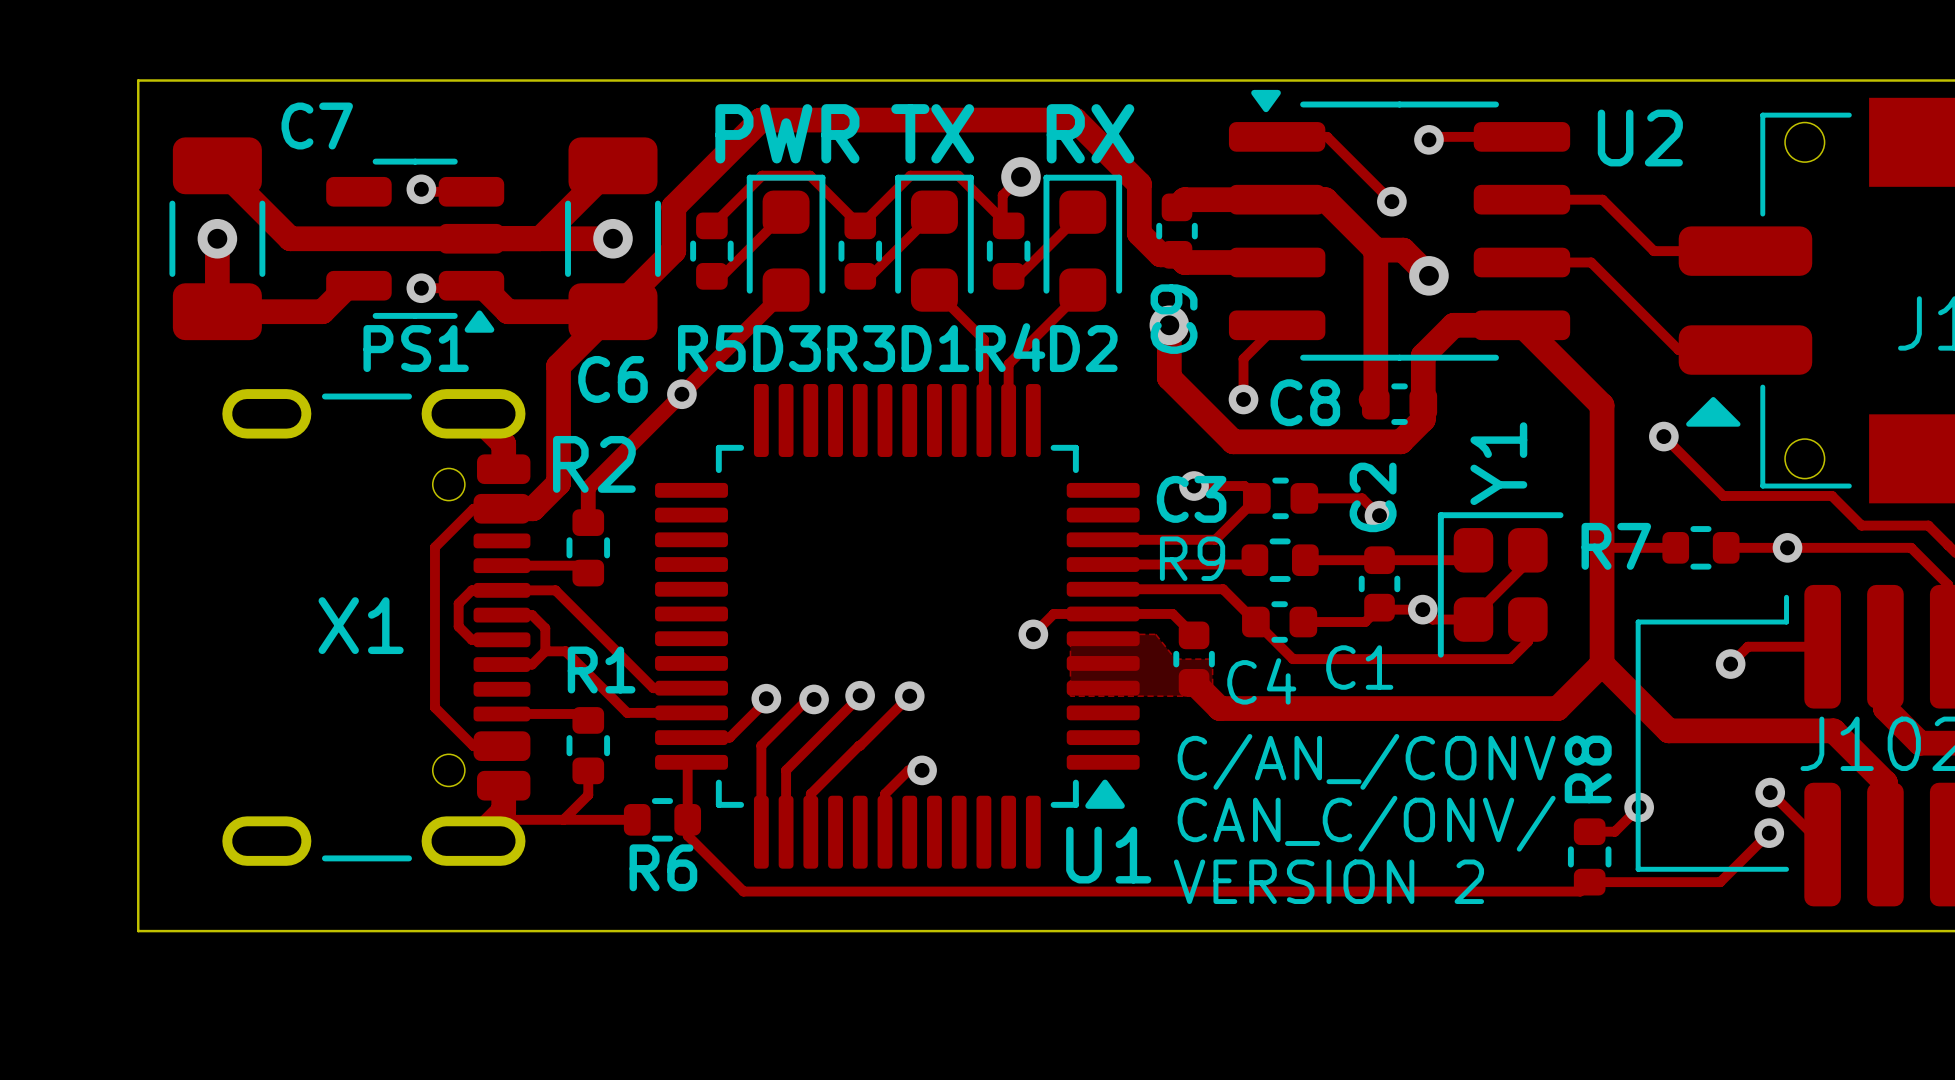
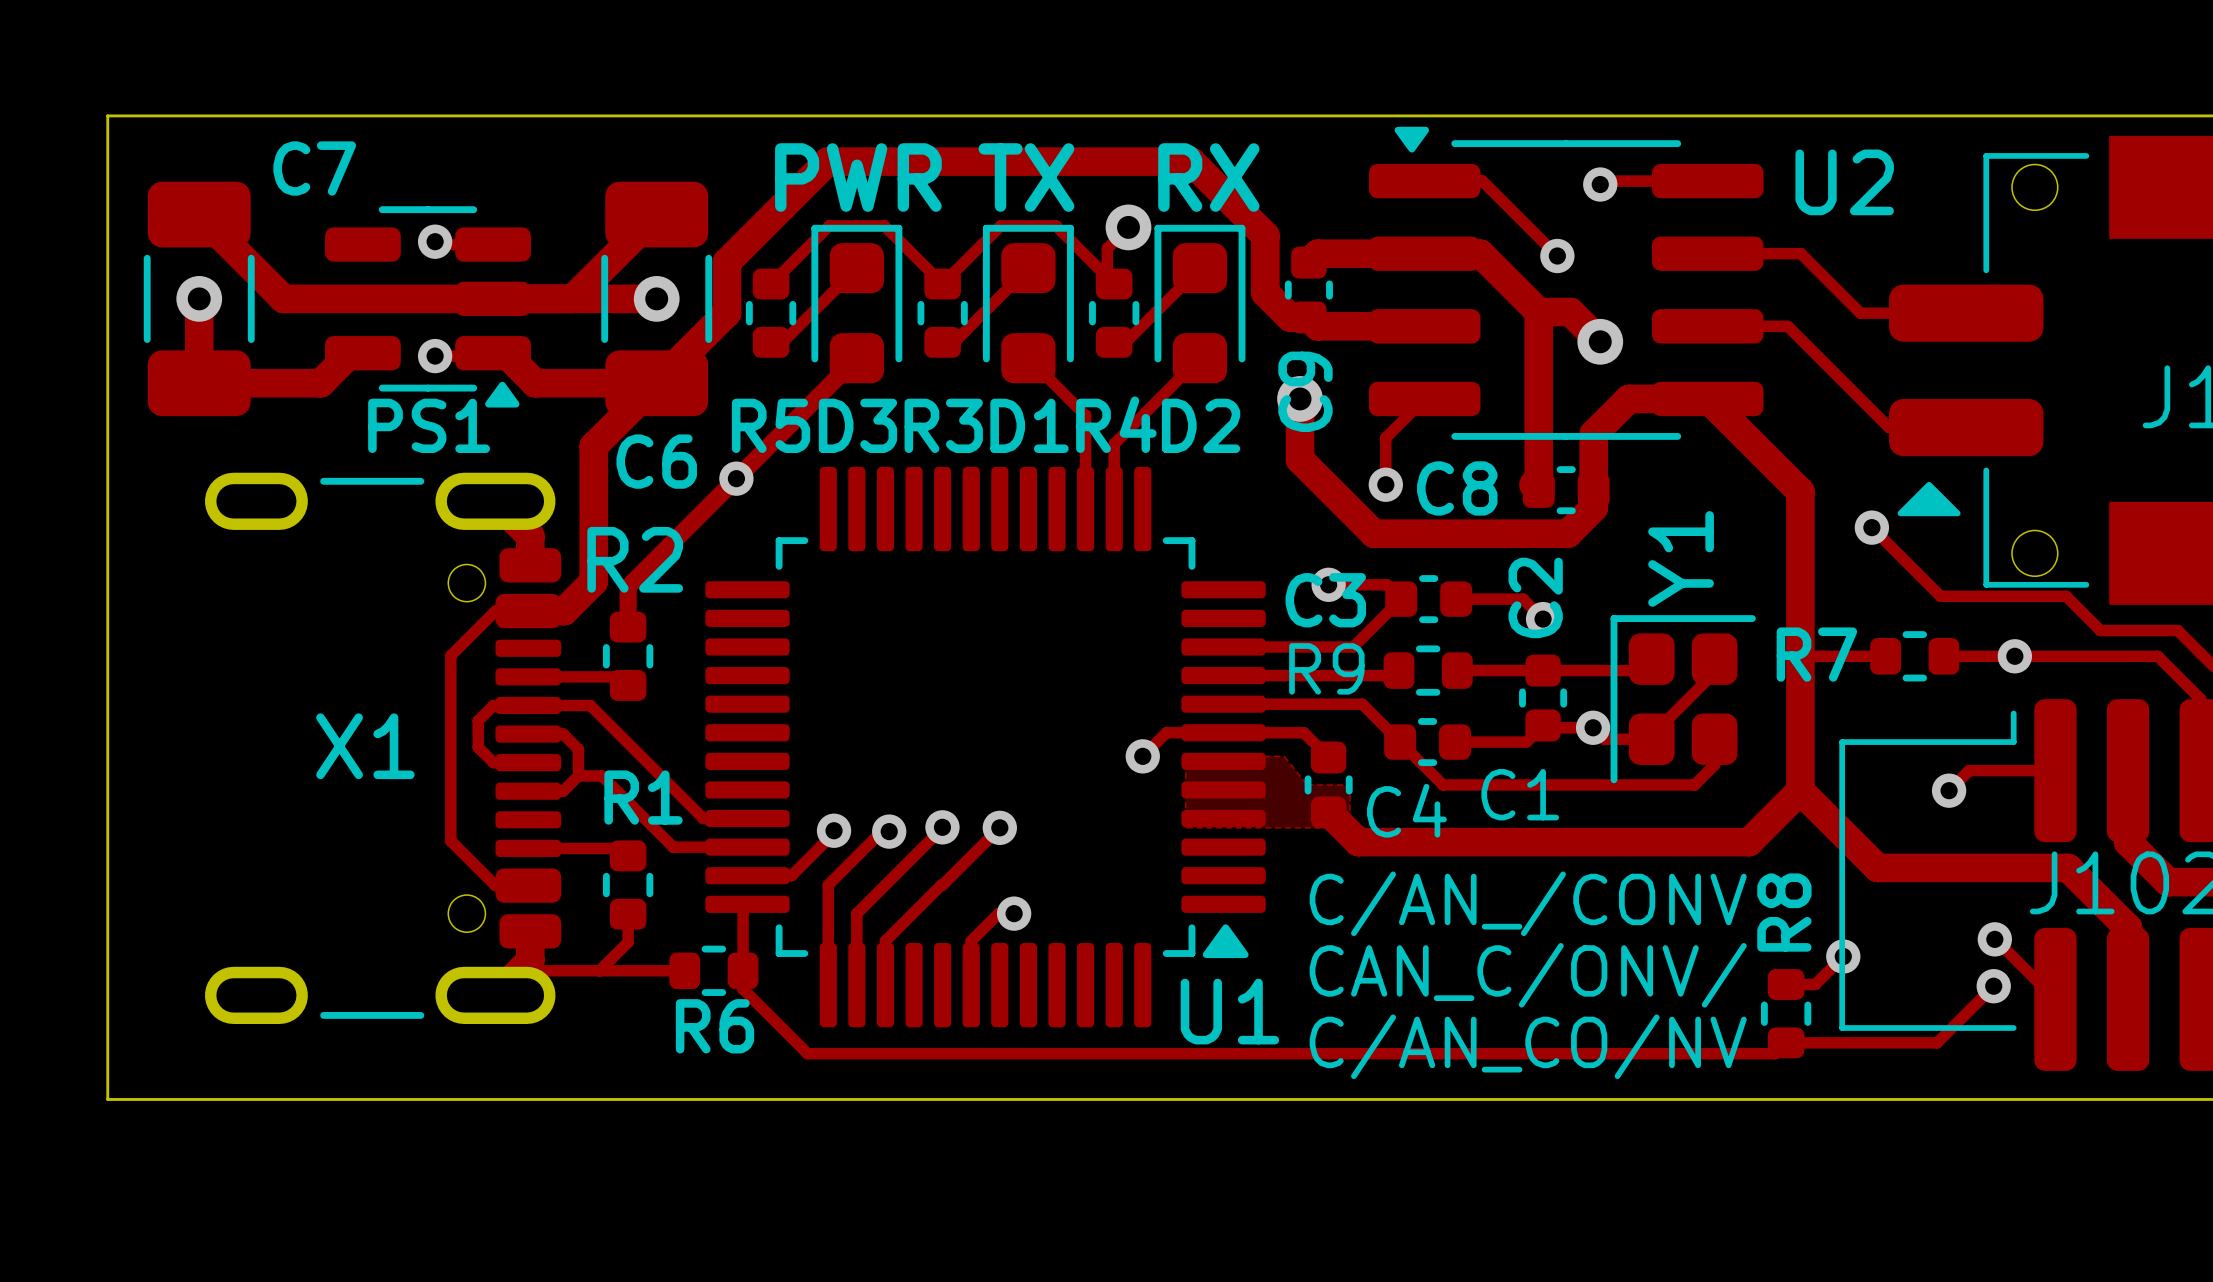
text: VERSION 2 (1328, 881) -> C/AN_CO/NV (1528, 1046)

